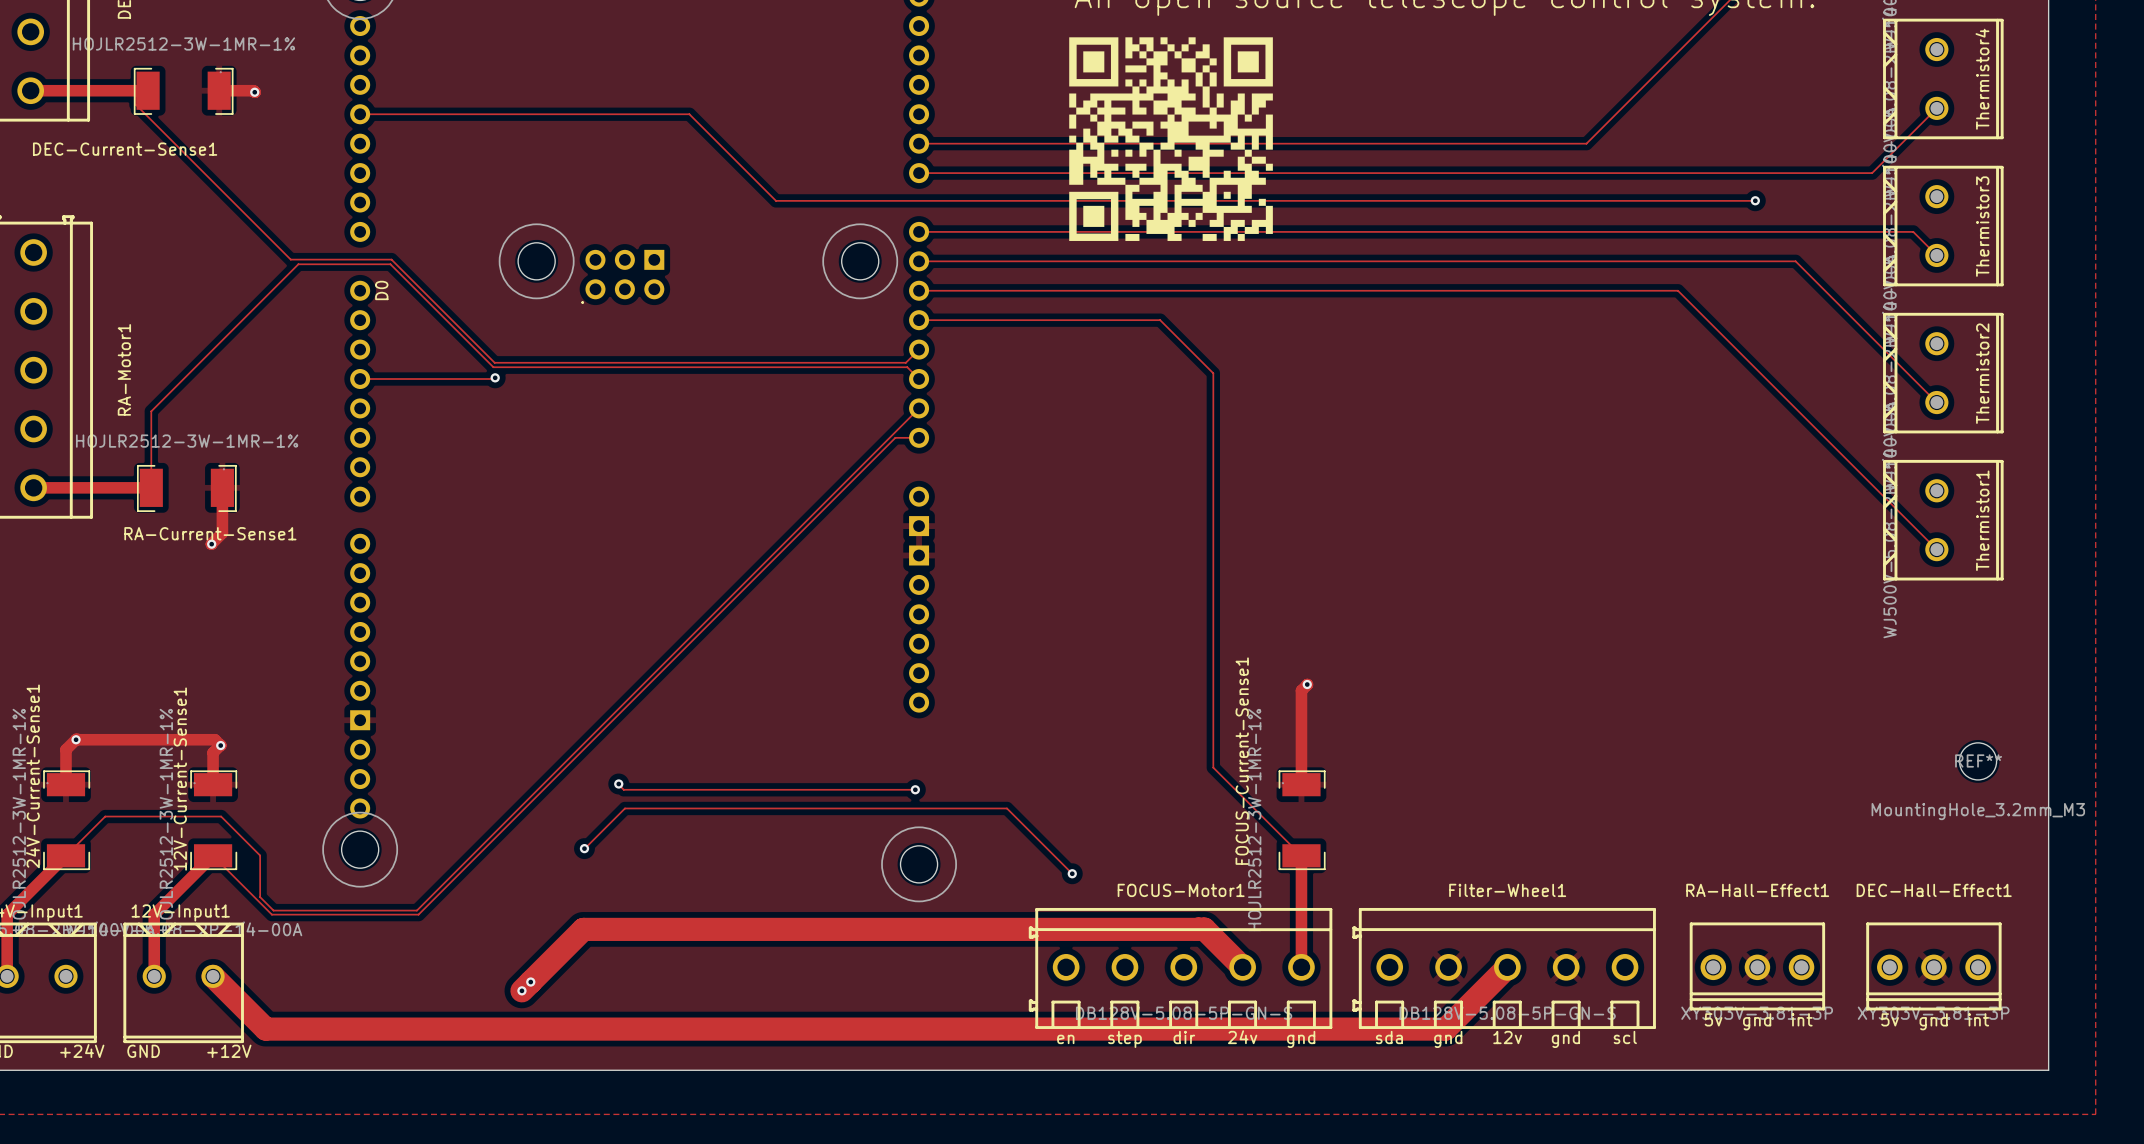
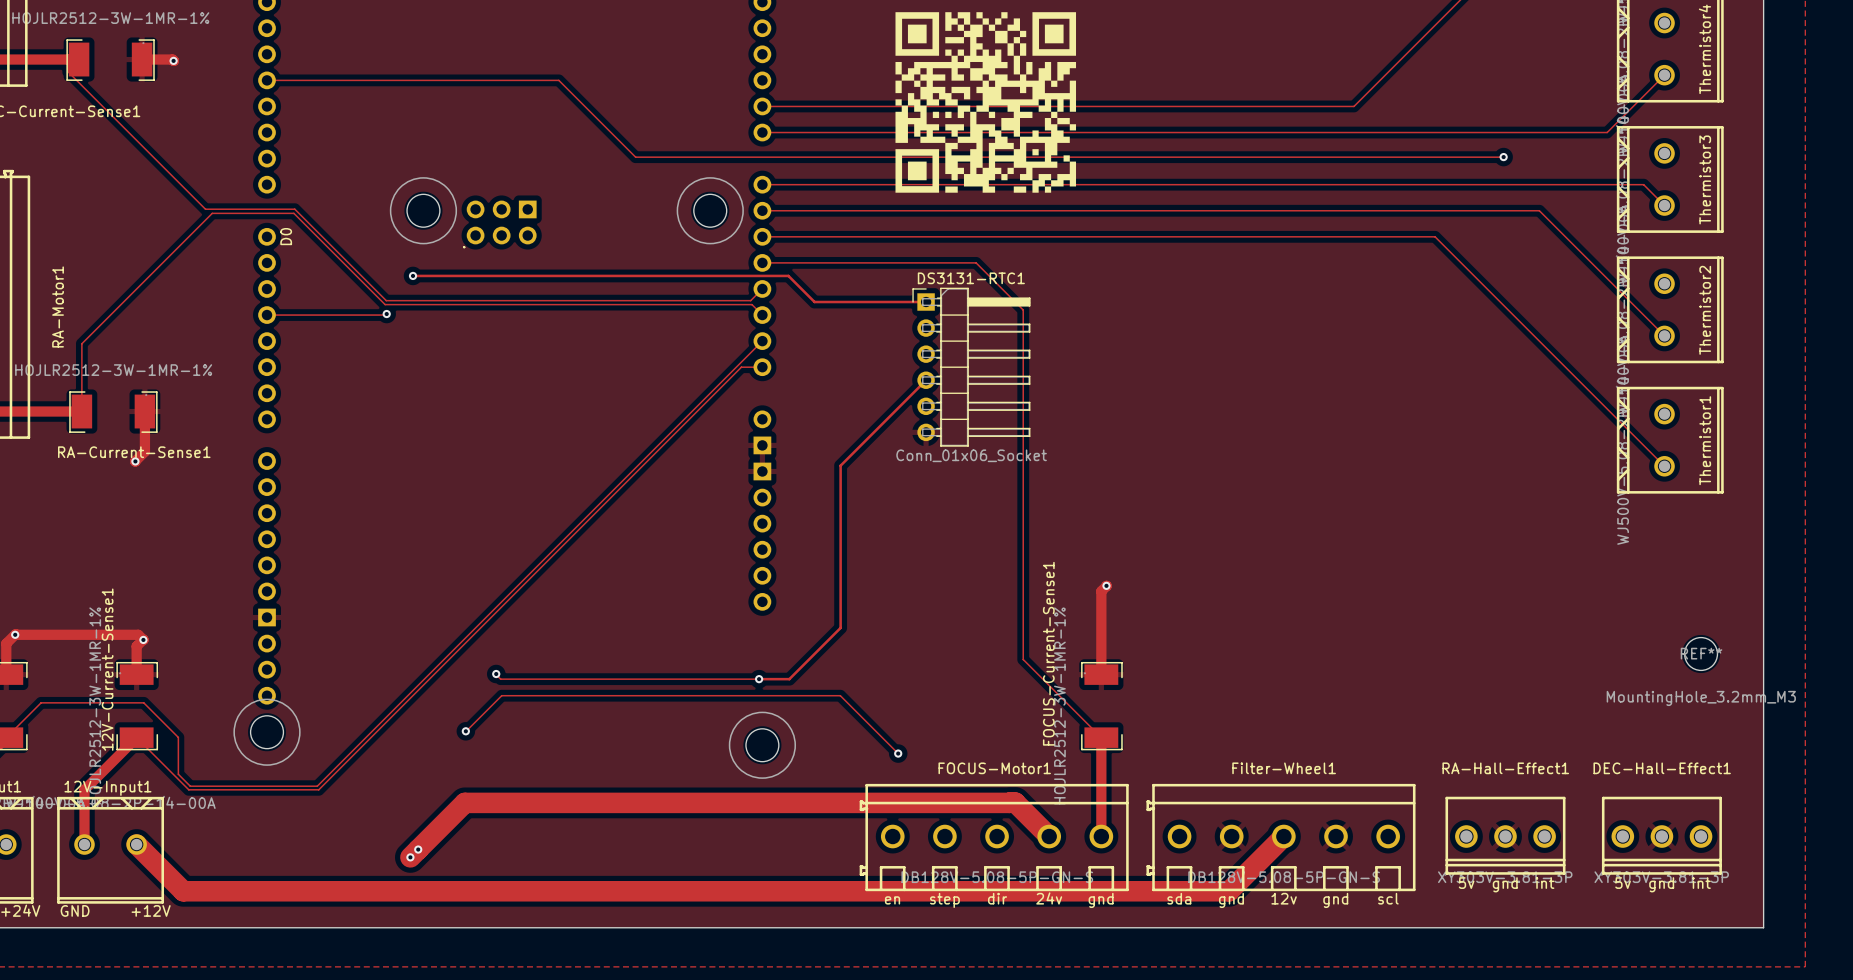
track: none -> (413, 275) (788, 275) (814, 302) (926, 302)
via: none -> (413, 275)
DS3131-RTC1: none -> Conn_01x06_Socket (971, 367)
track: none -> (926, 380) (840, 465) (840, 627) (789, 679) (759, 679)

